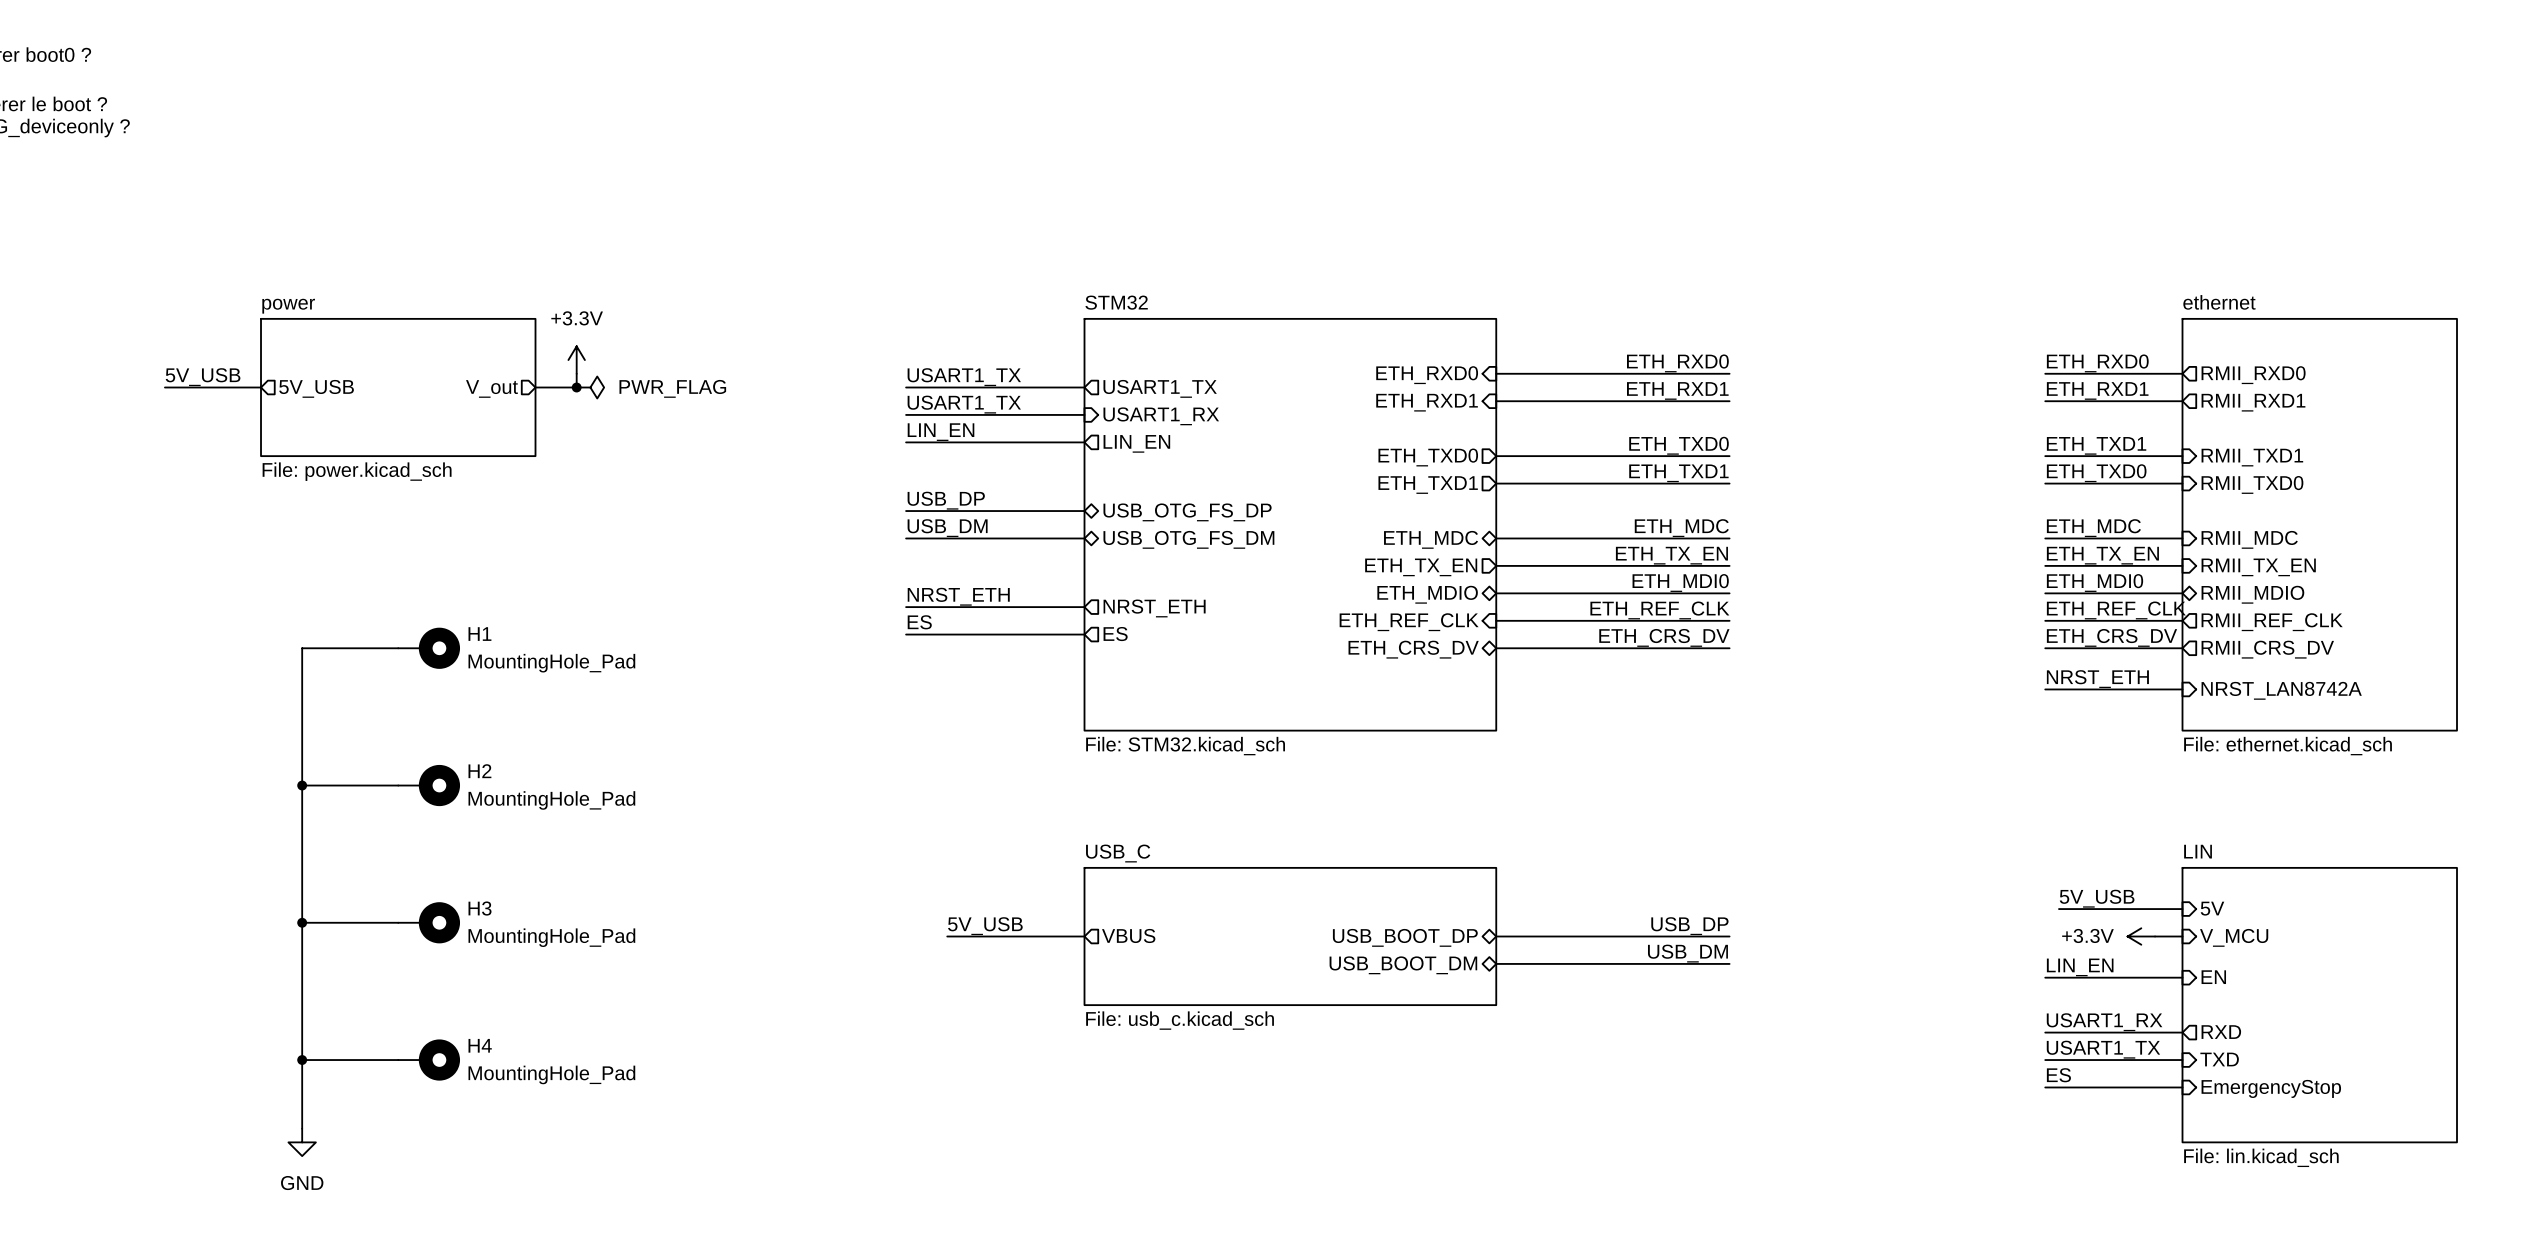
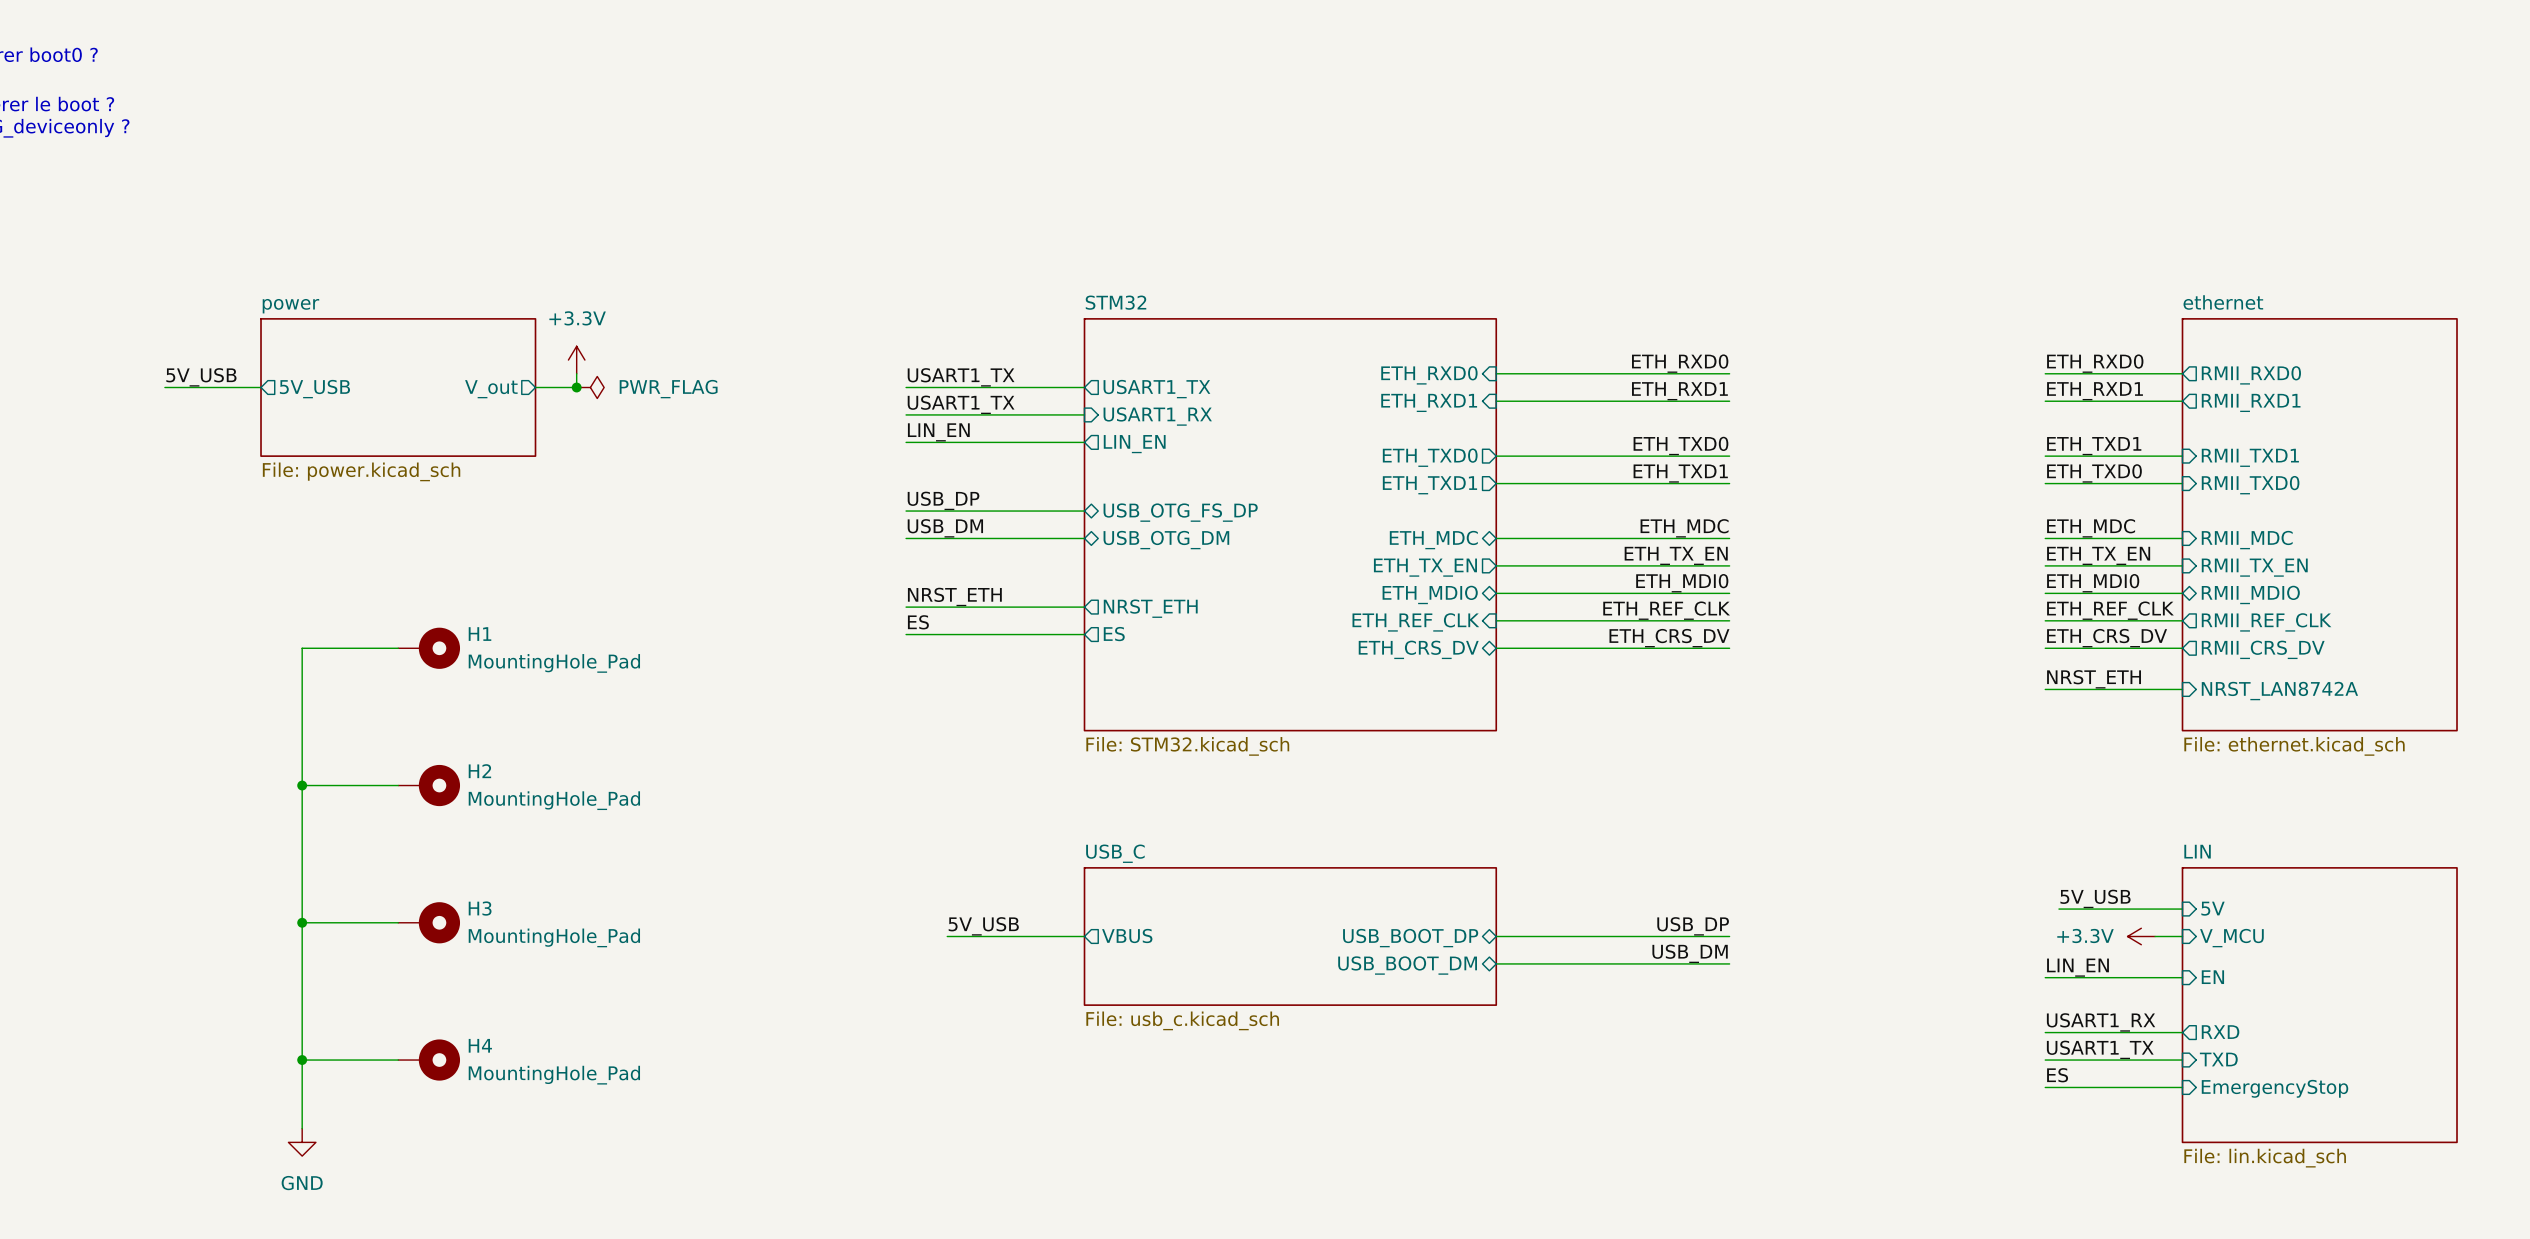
sheet pin: USB_OTG_FS_DM (1188, 539) -> USB_OTG_DM (1166, 540)

